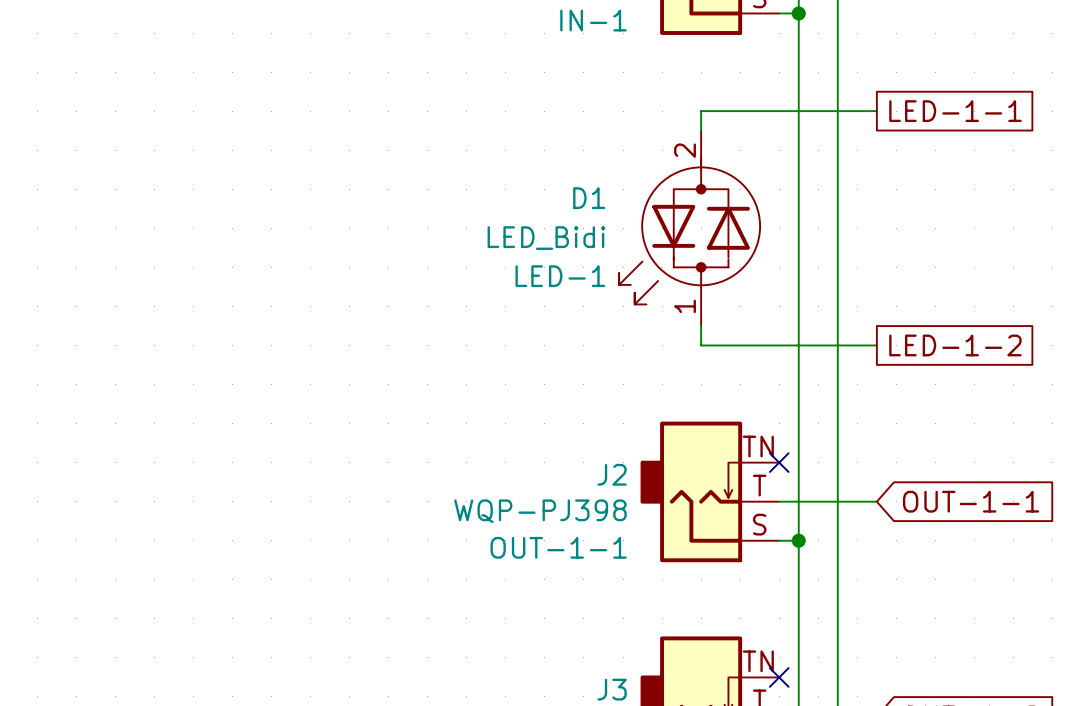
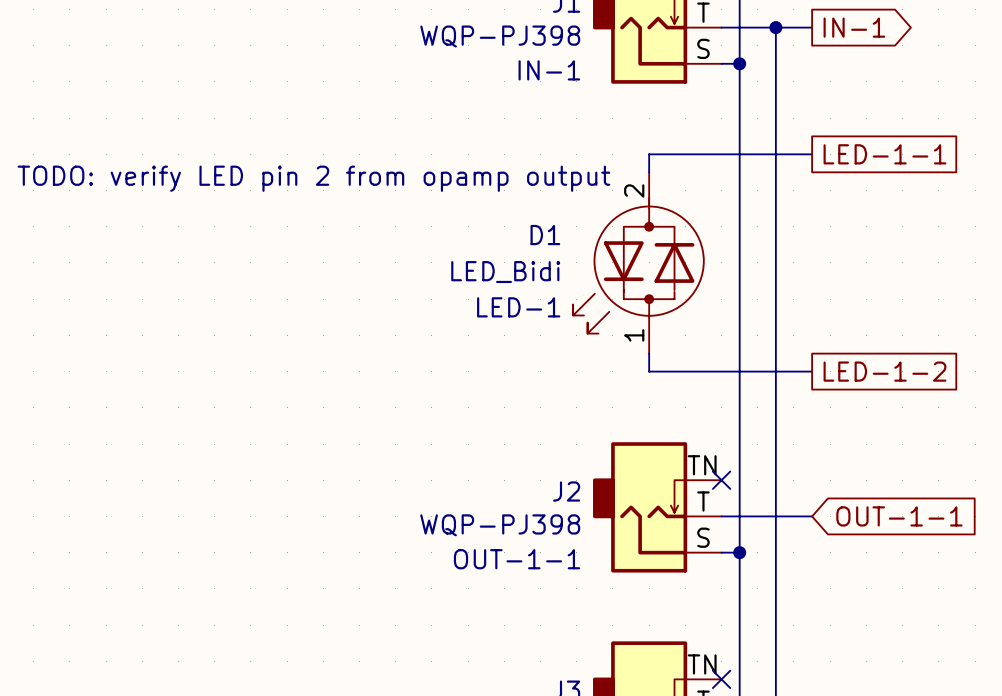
text: none -> TODO: verify LED pin 2 from opamp output (313, 178)

